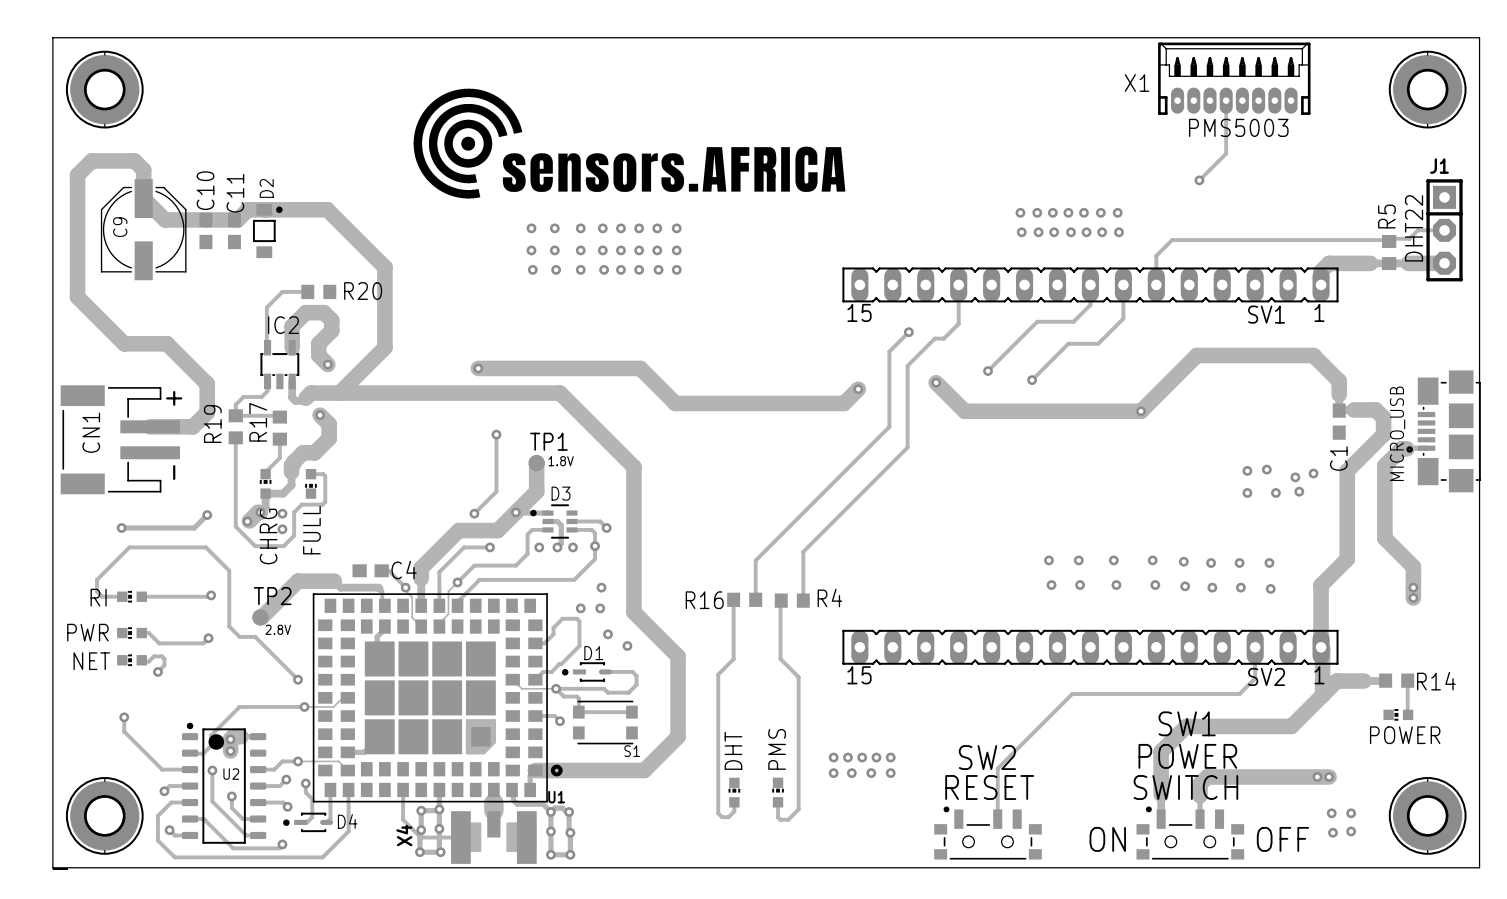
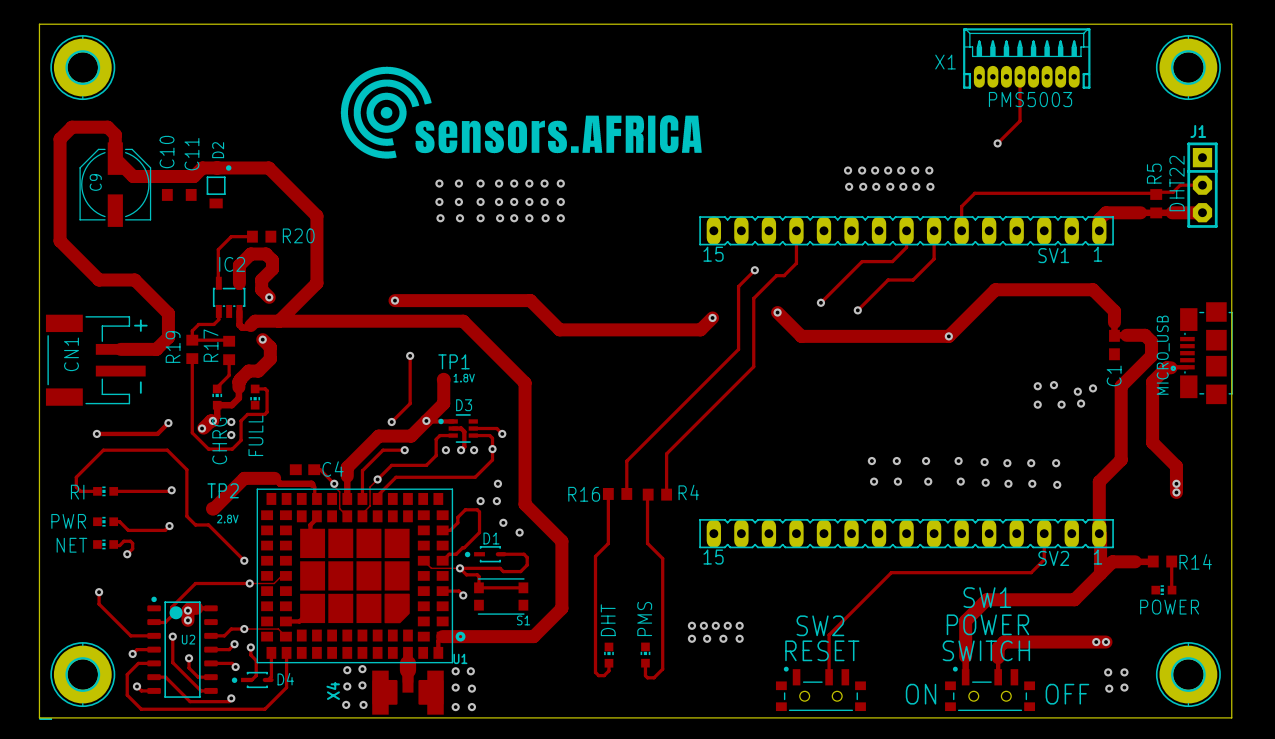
track: (403, 789) (403, 819) (420, 837) -> none
track: (439, 789) (440, 852) (419, 852) (420, 837) -> none
track: (513, 791) (513, 800) (517, 804) (543, 804) (550, 812) -> none
track: (439, 809) (421, 810) (421, 830) -> none
track: (550, 812) (554, 808) (562, 808) (569, 812) (570, 854) (550, 854) (550, 812) -> none
track: (420, 837) (460, 837) -> none

